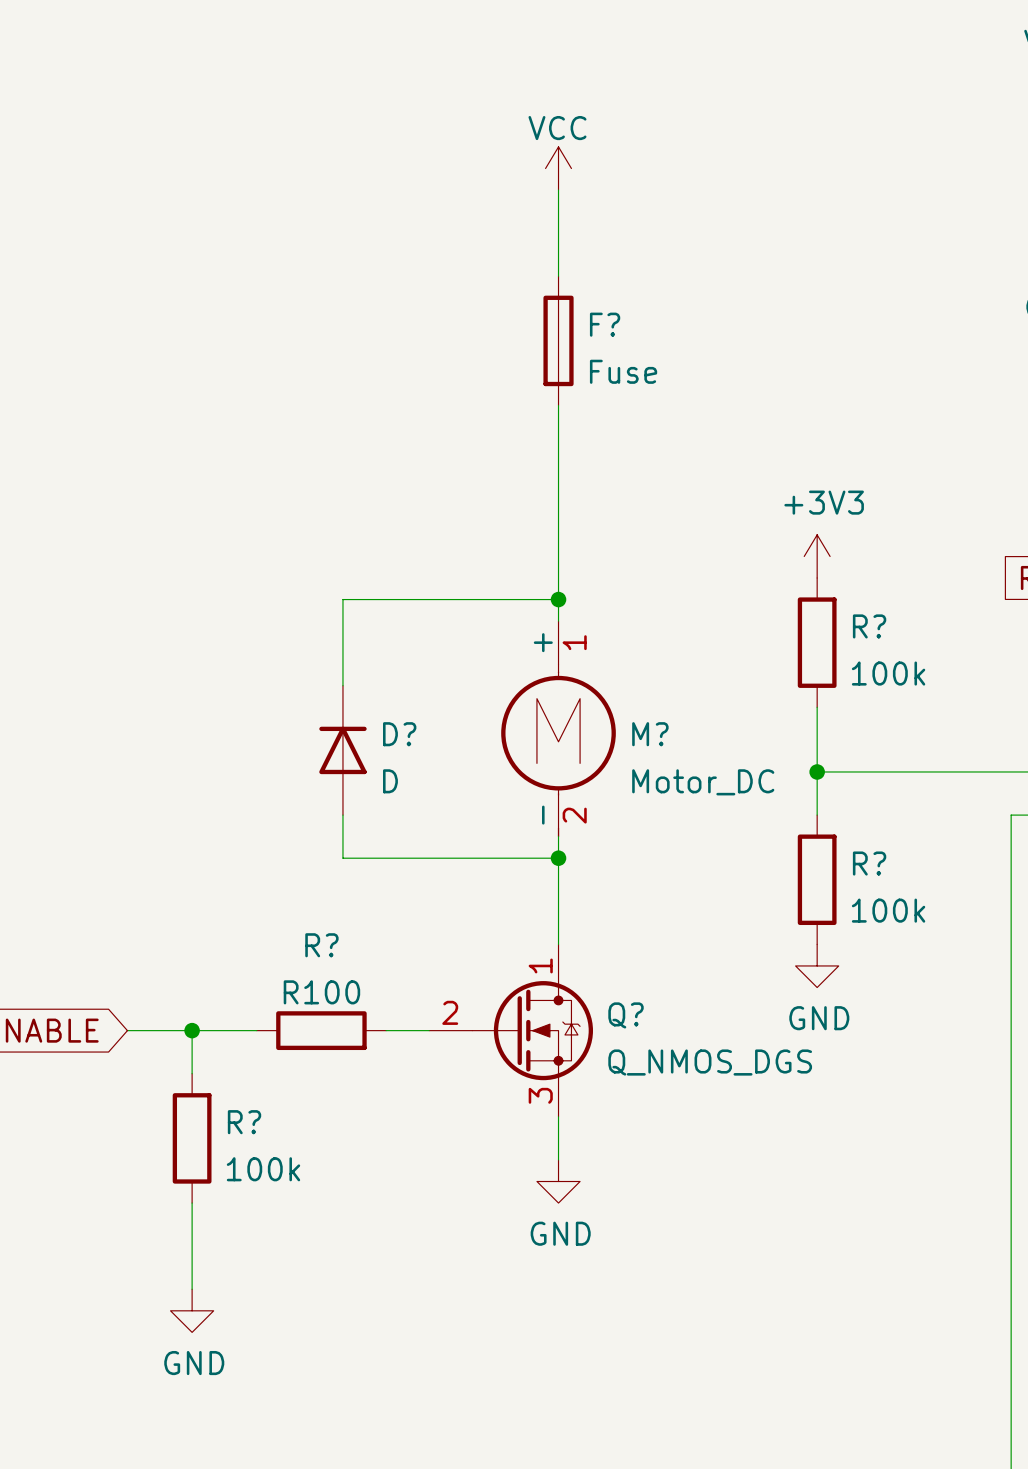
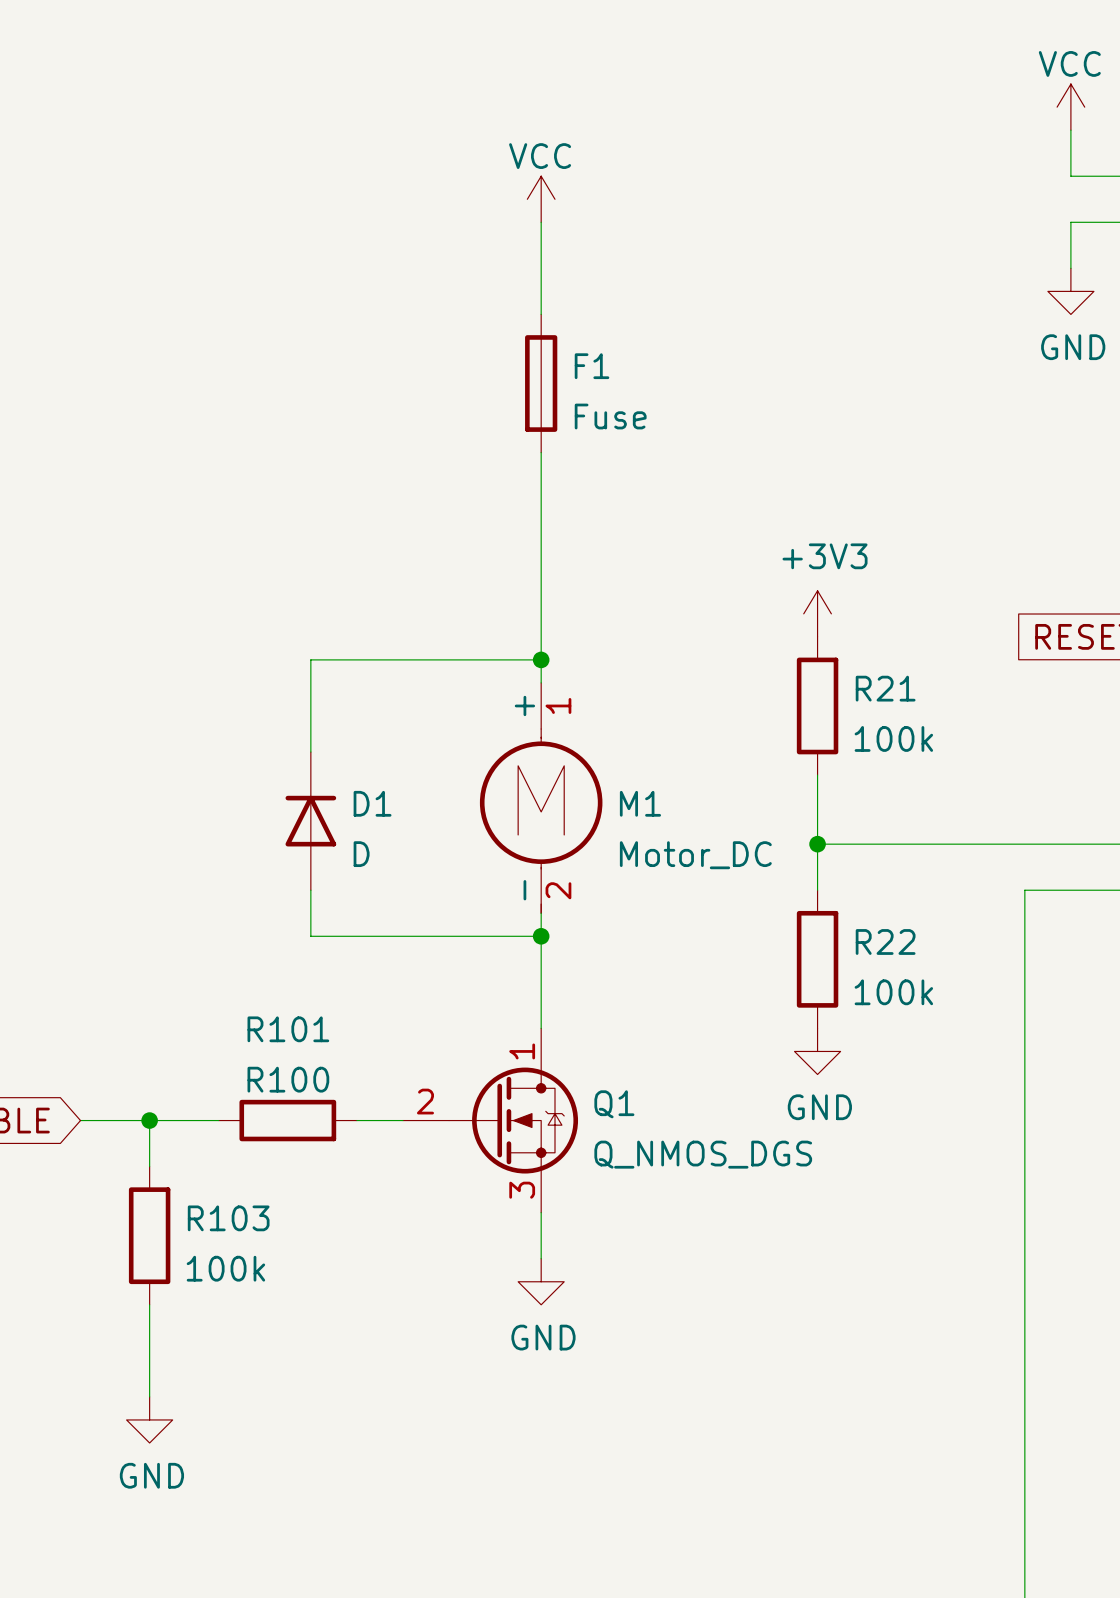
F? name: F? (605, 324) -> F1 (592, 366)
R? name: R? (869, 626) -> R21 (885, 688)
D? name: D? (399, 734) -> D1 (372, 803)
M? name: M? (650, 734) -> M1 (640, 803)
R? name: R? (869, 863) -> R22 (885, 941)
R? name: R? (321, 945) -> R101 (288, 1029)
Q? name: Q? (626, 1015) -> Q1 (614, 1104)
R? name: R? (244, 1122) -> R103 (228, 1218)

